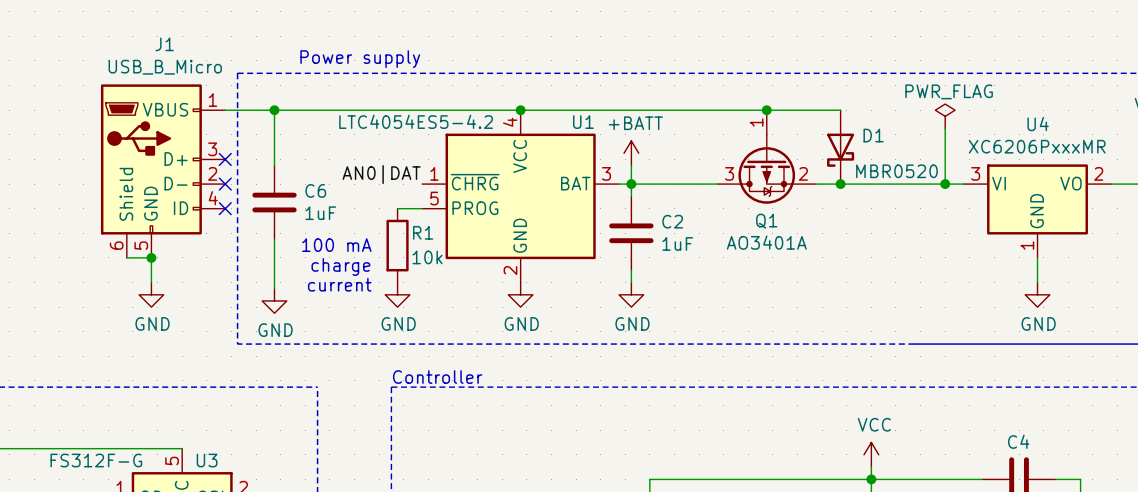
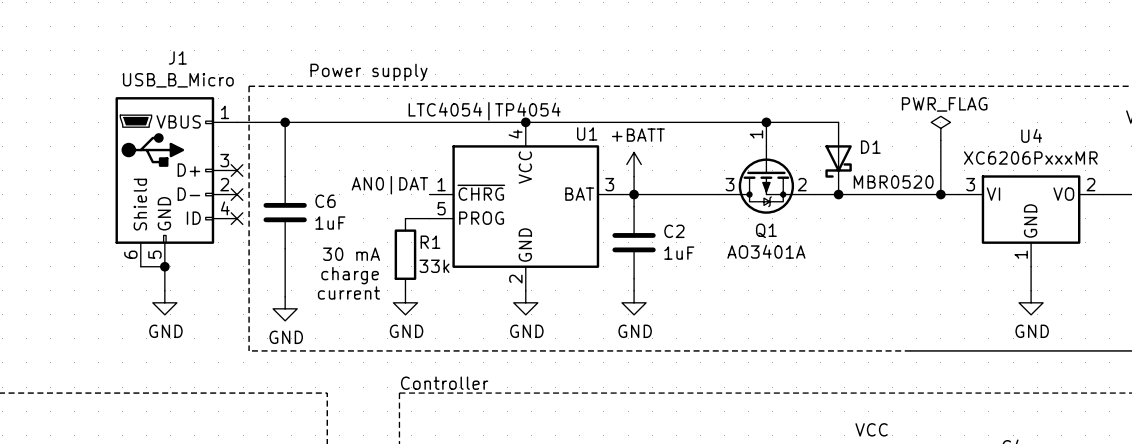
U1 value: LTC4054ES5-4.2 (416, 121) -> LTC4054|TP4054 (484, 111)
text: 100 mA (336, 245) -> 30 mA (351, 254)
R1 value: 10k (427, 257) -> 33k (434, 266)

